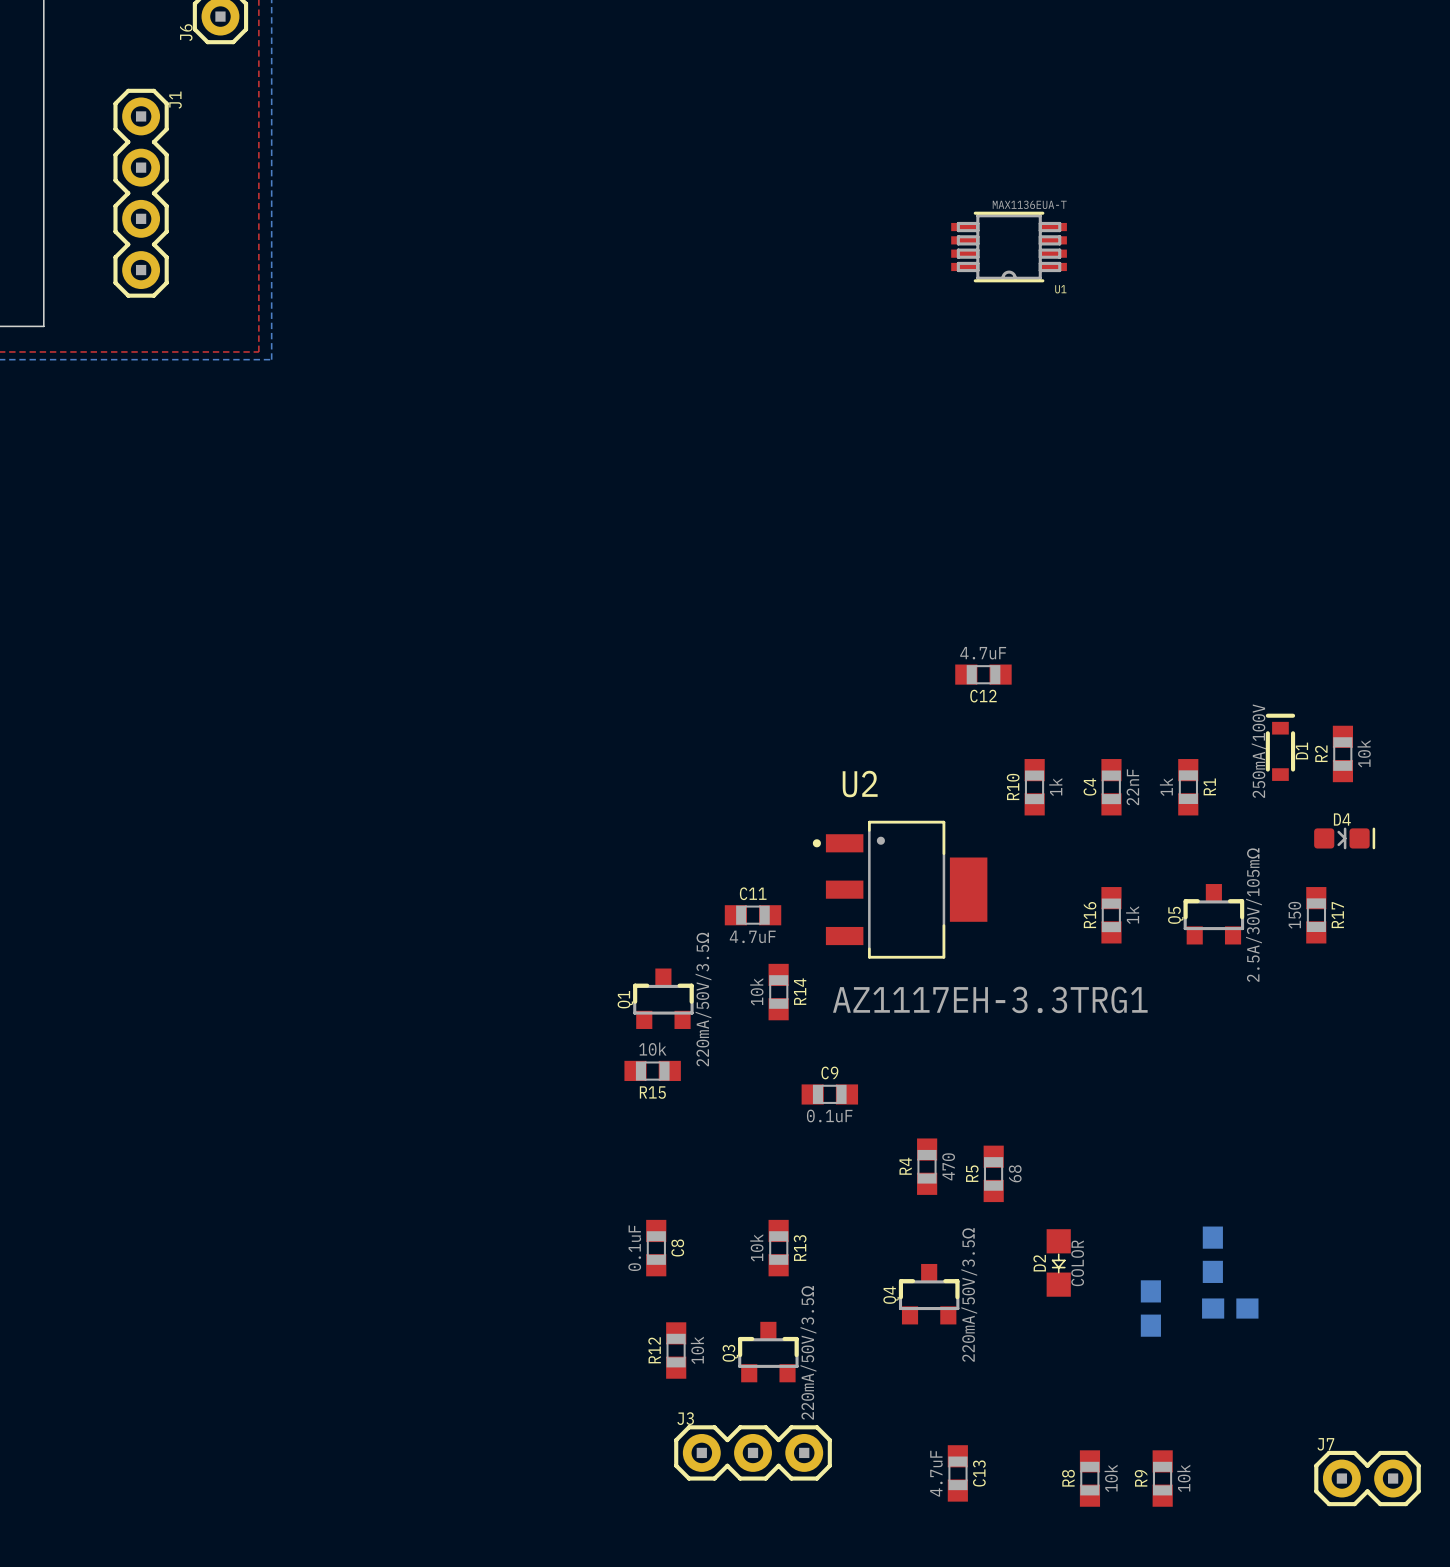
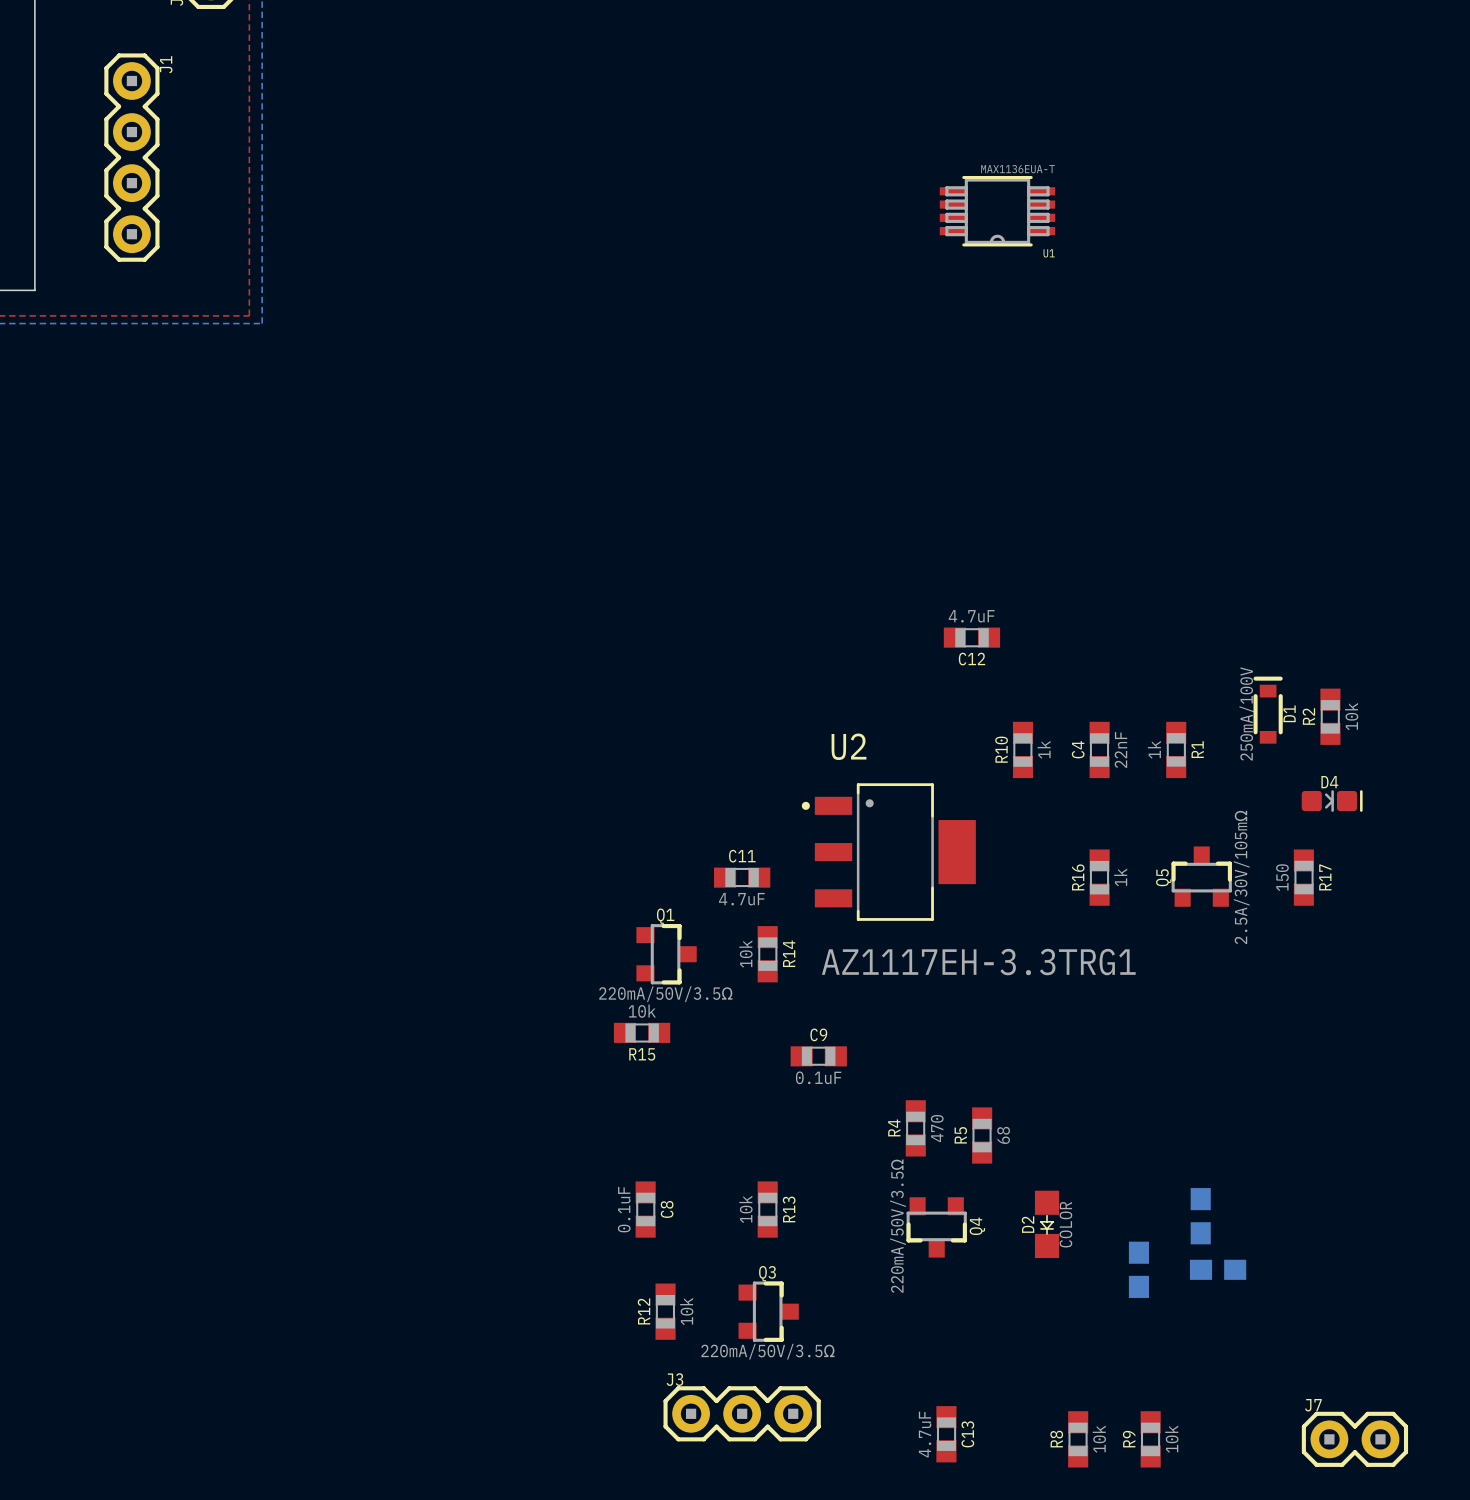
Q1 rotation: 0° (663, 998) -> 90° clockwise (666, 954)
Q4 rotation: 0° (929, 1294) -> 180° (936, 1227)
Q3 rotation: 0° (768, 1352) -> 90° clockwise (768, 1311)

